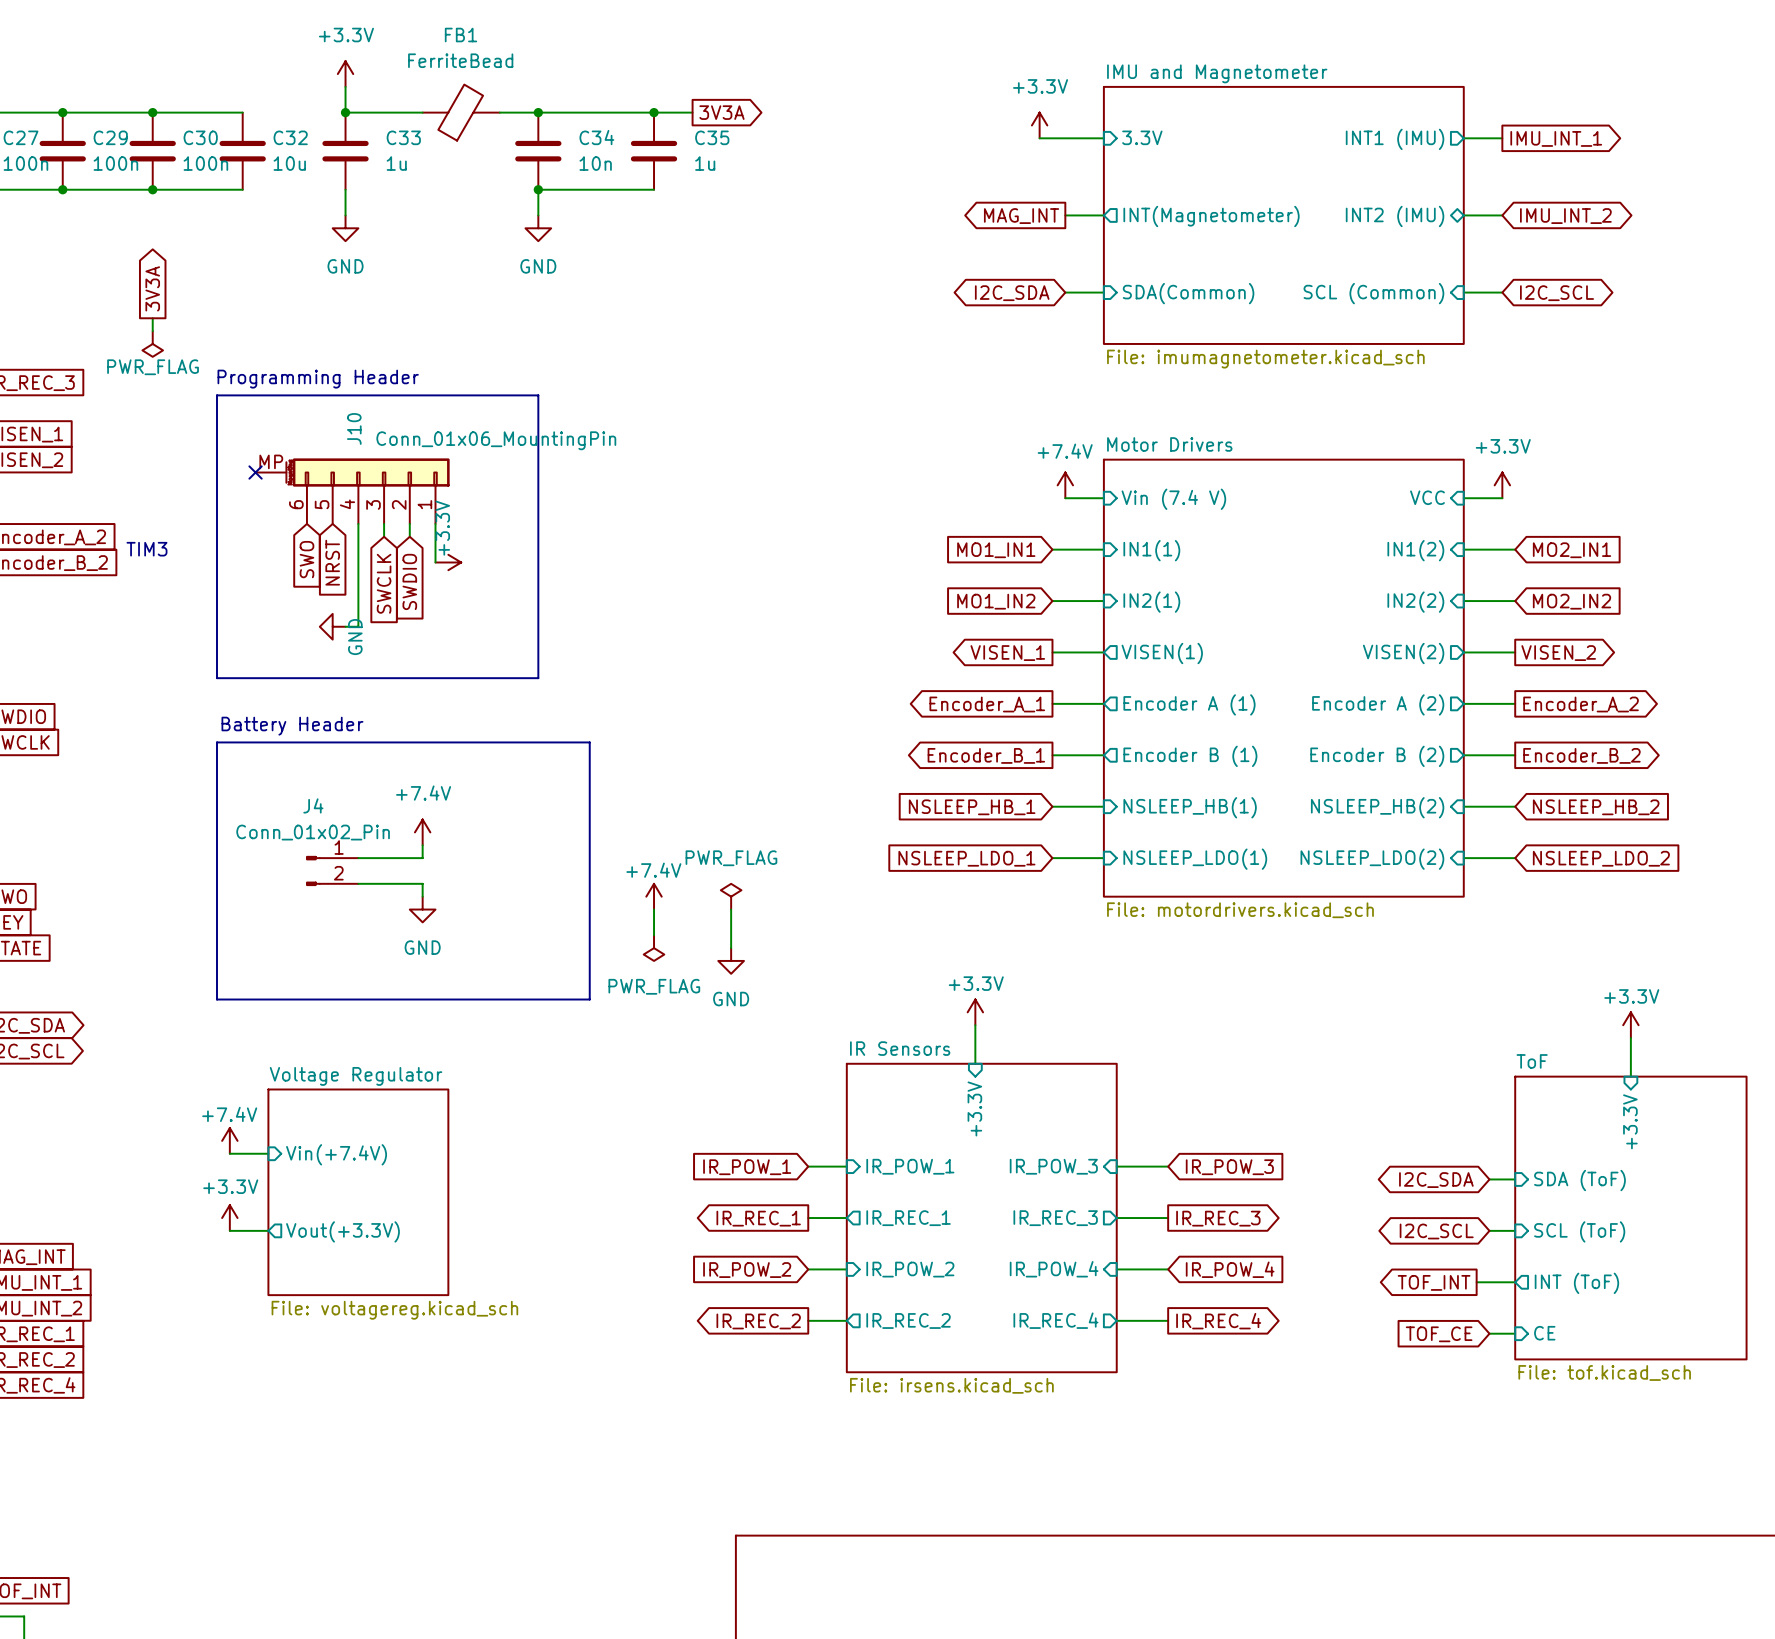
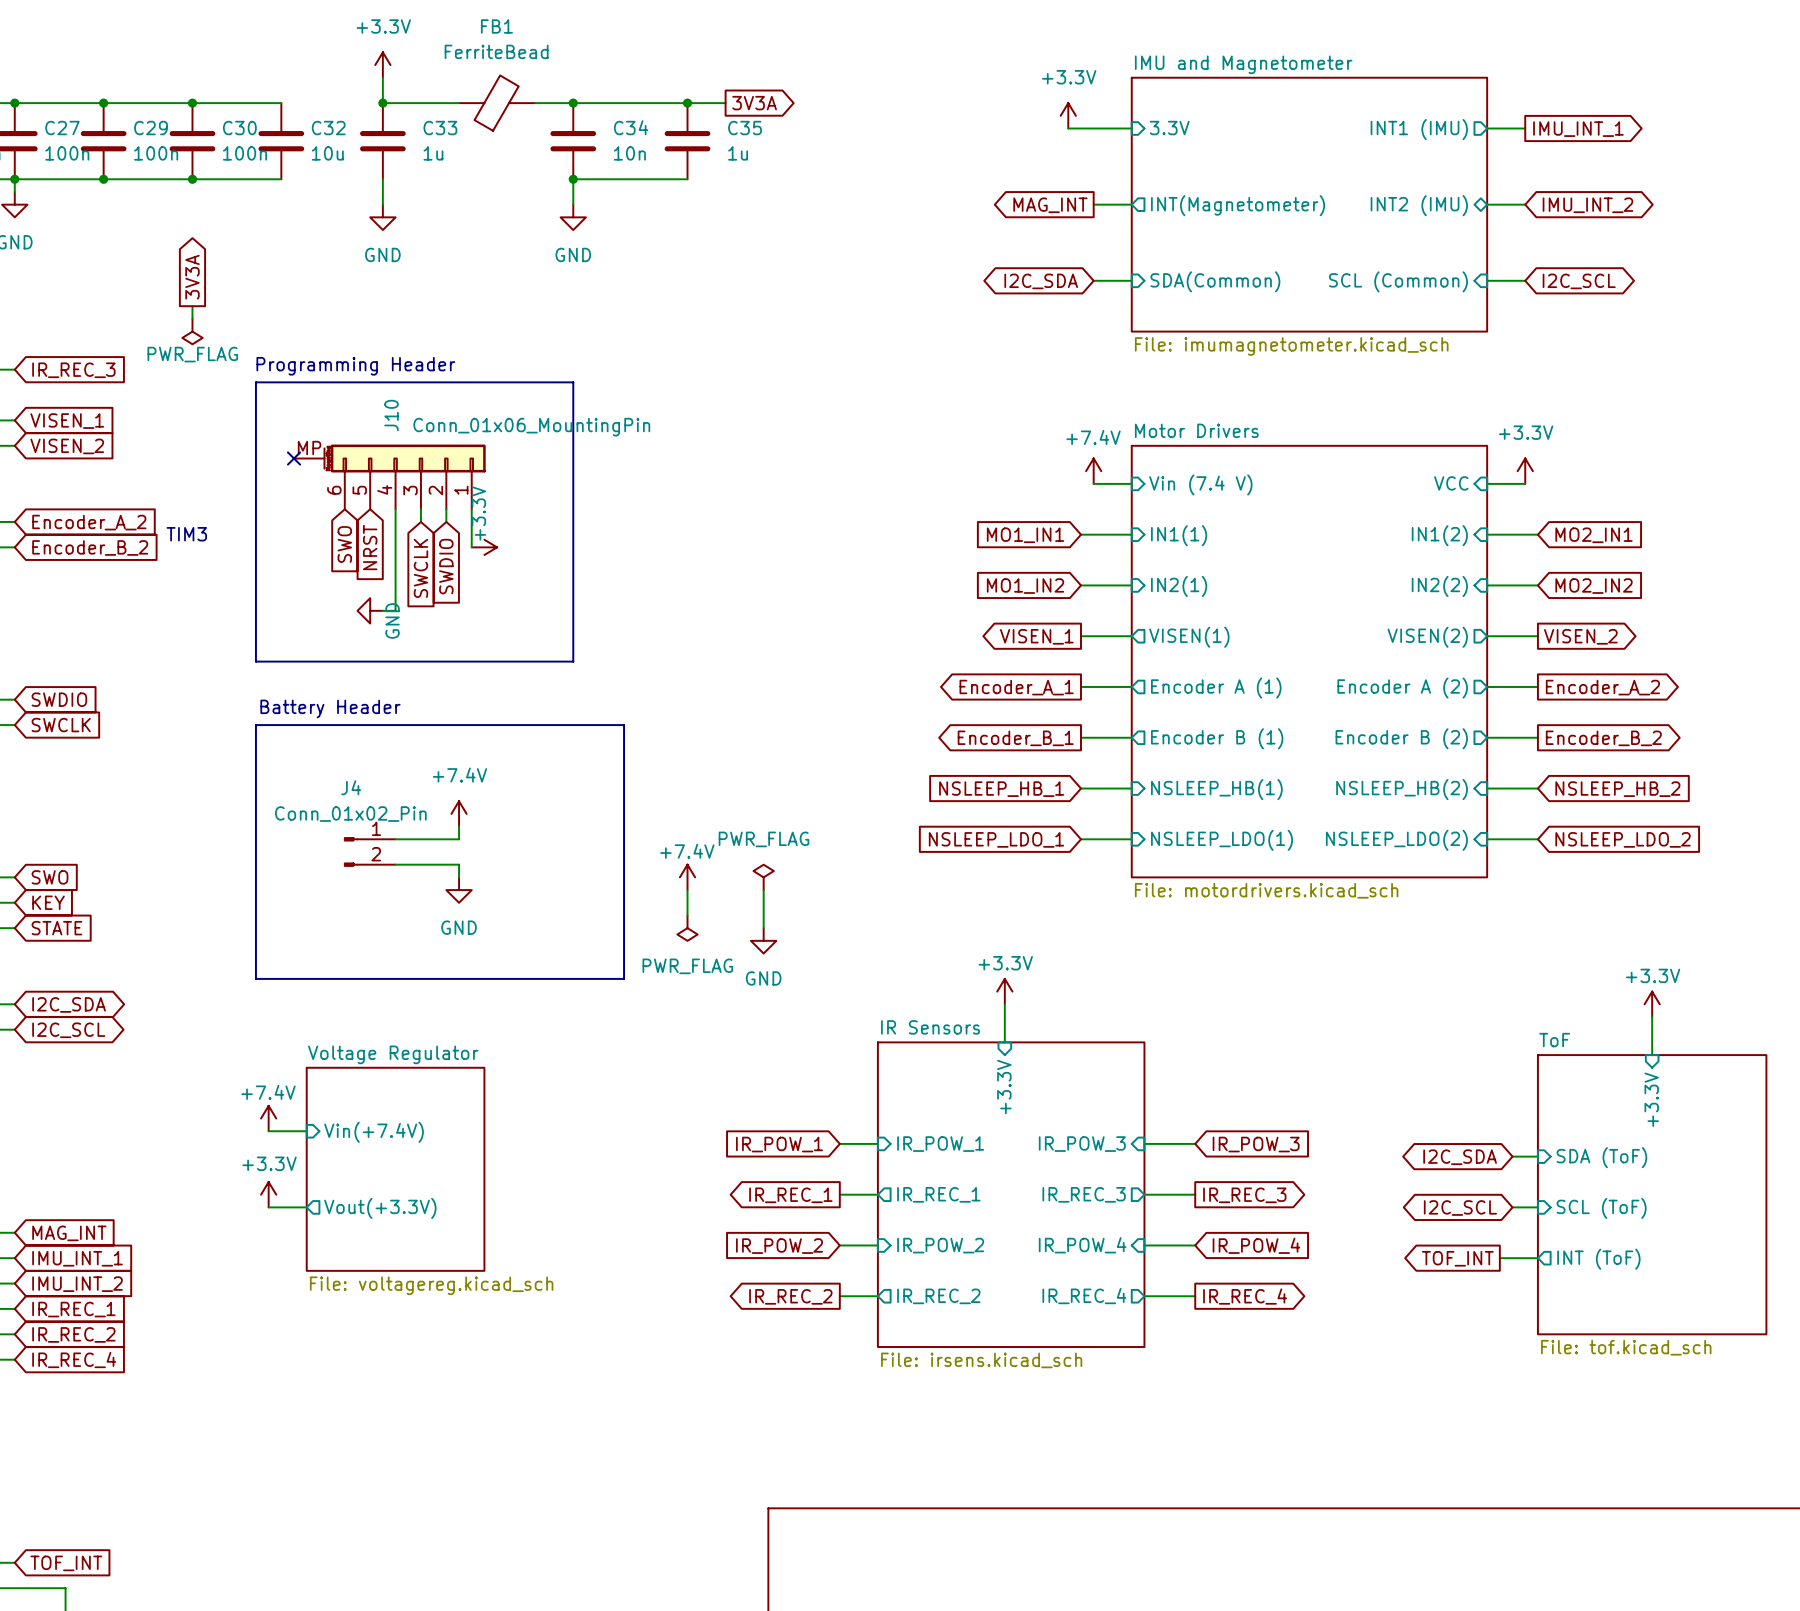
wire: (1489, 1333) (1515, 1333) -> none
sheet pin: CE (1544, 1333) -> none
global label: TOF_CE (1439, 1334) -> none

